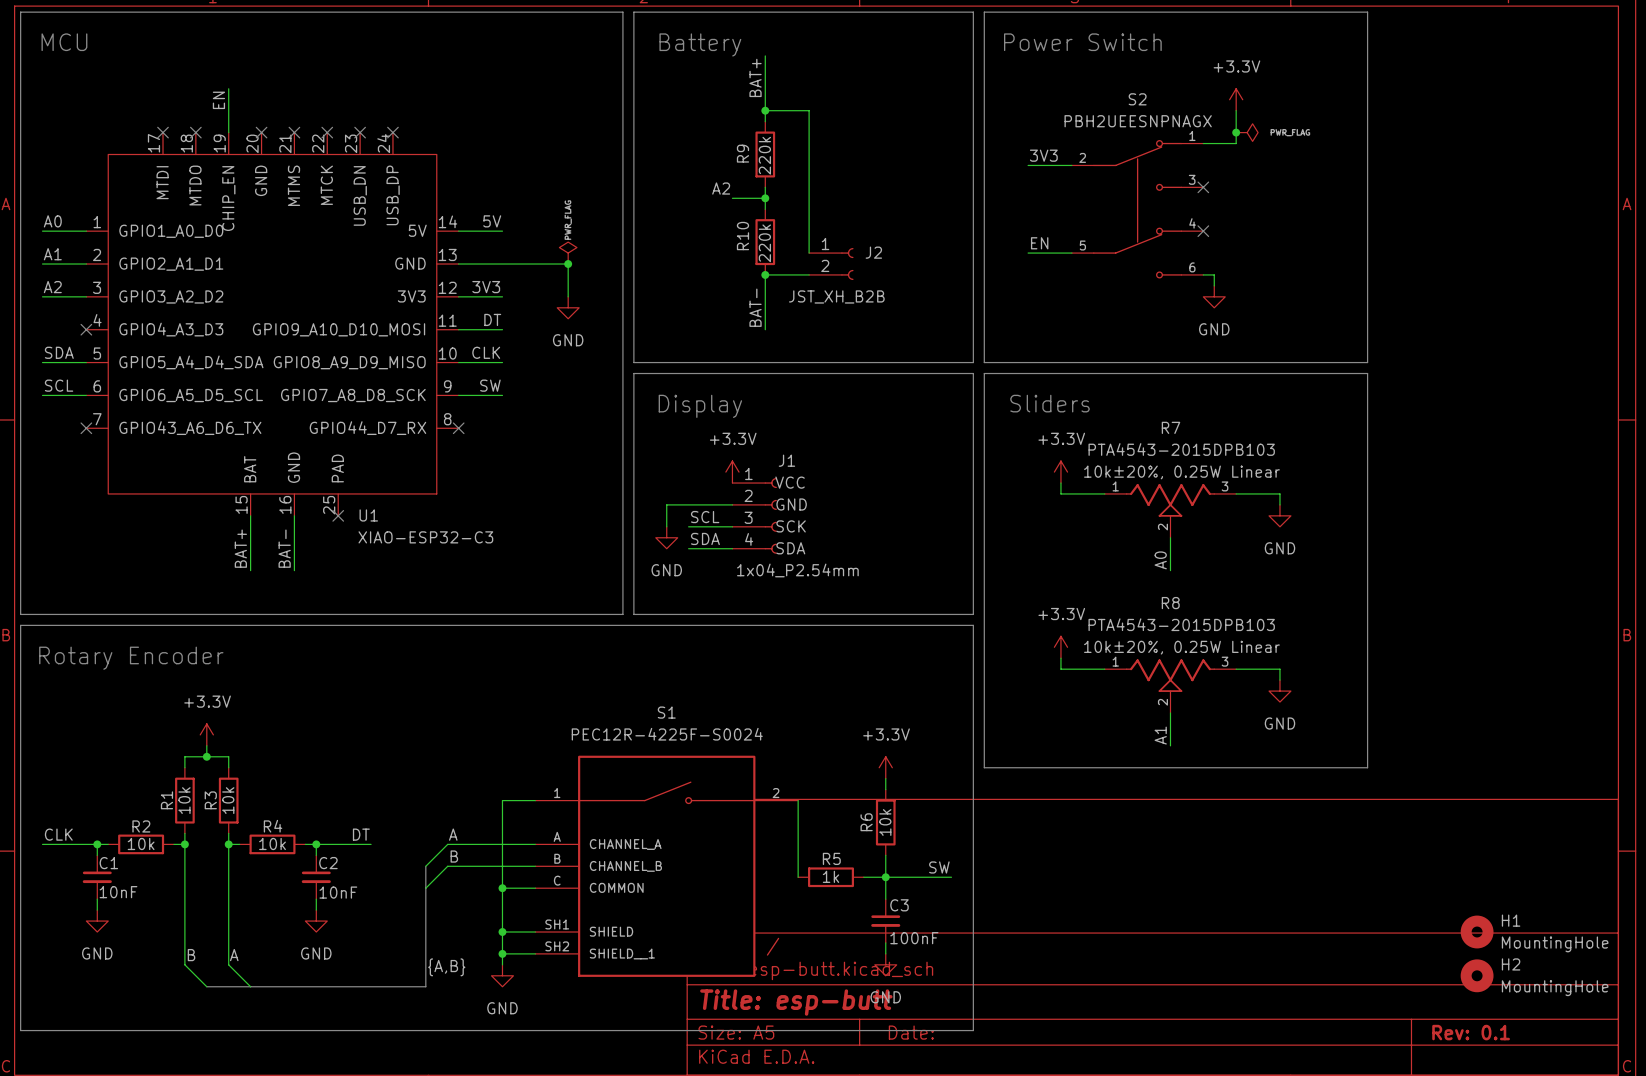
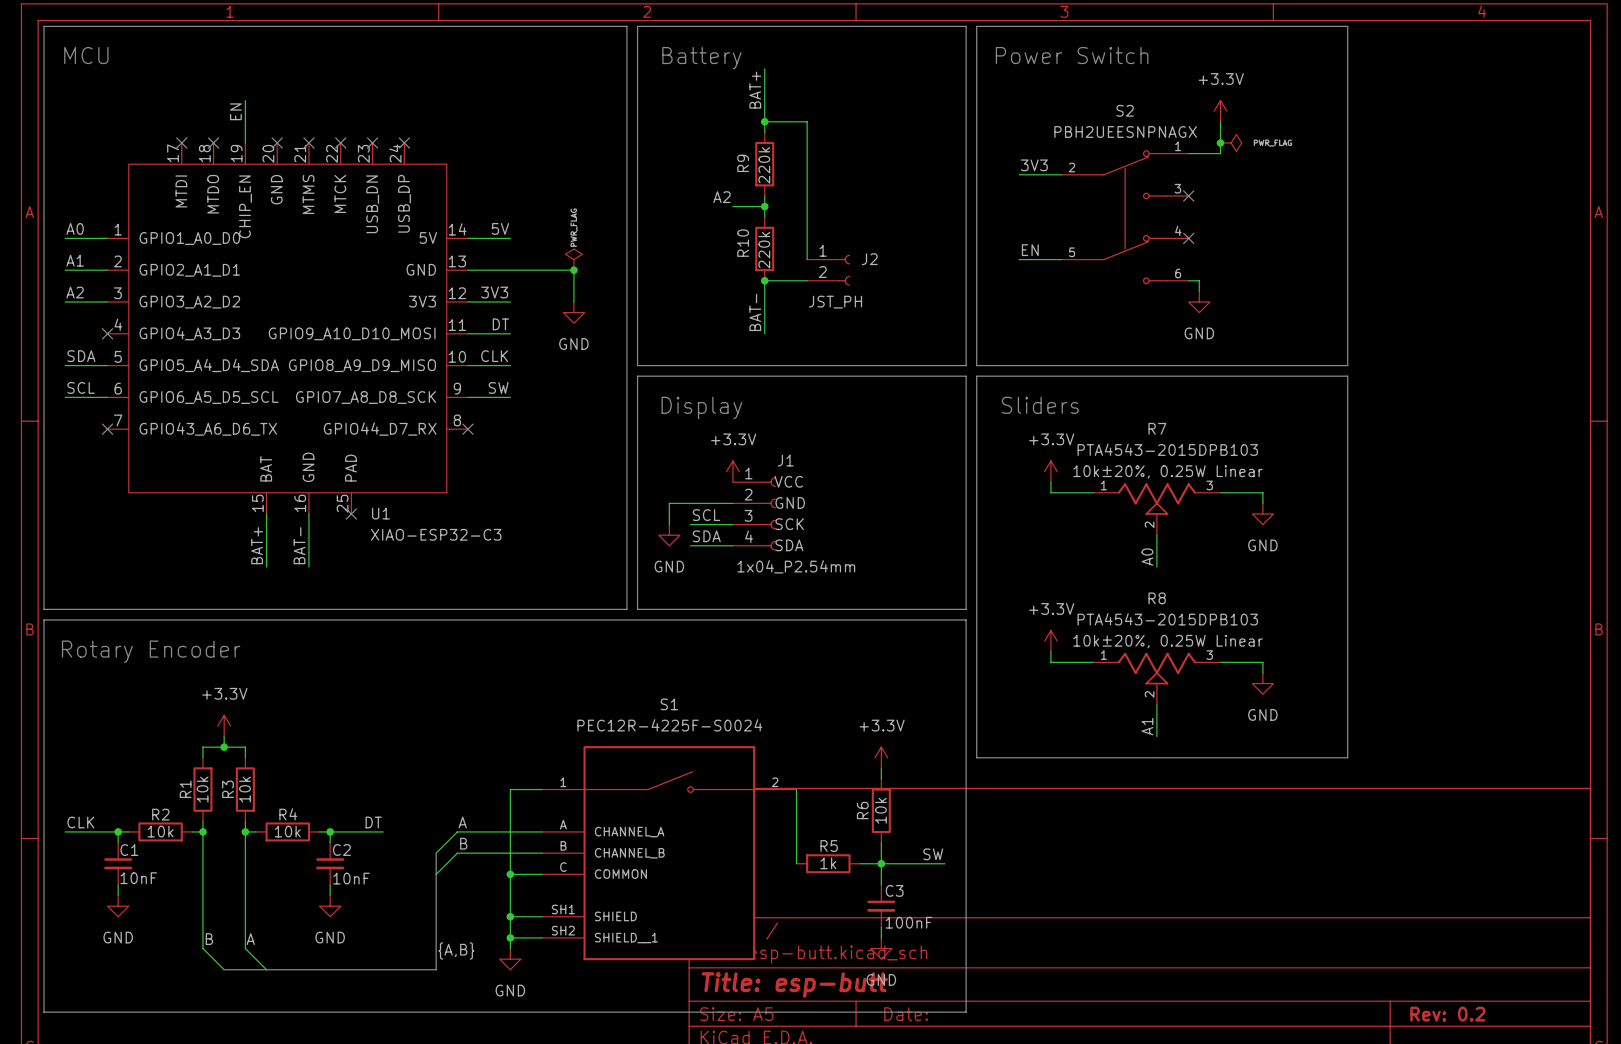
J2 value: JST_XH_B2B (836, 296) -> JST_PH (835, 302)
H1: MountingHole (1477, 932) -> none
H2: MountingHole (1477, 975) -> none
title block: Rev: 0.1 (1471, 1032) -> Rev: 0.2 (1447, 1014)

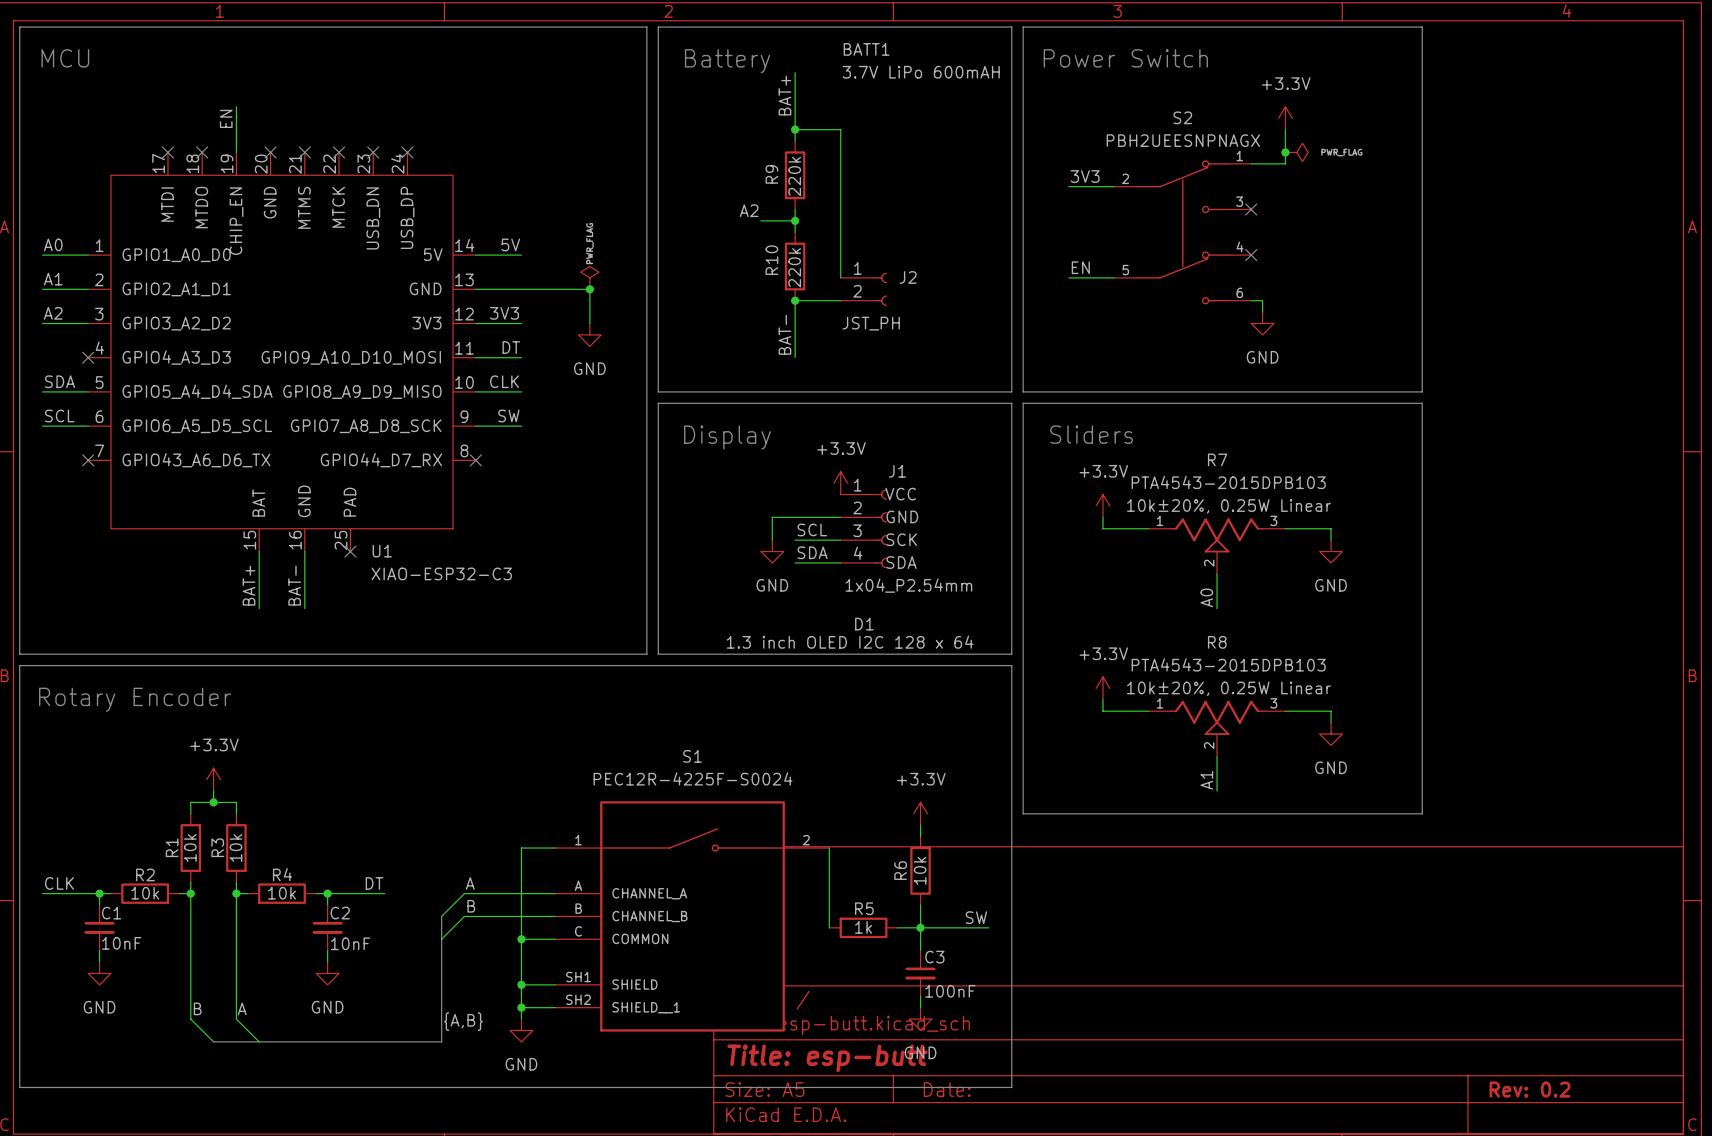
BATT1: none -> 3.7V LiPo 600mAH (921, 60)
power symbol position: +3.3V (732, 471) -> +3.3V (840, 483)
wire: (732, 503) (669, 503) (669, 524) -> (840, 517) (772, 517) (772, 540)
J1 position: (754, 513) -> (863, 528)
label position: SCL (706, 515) -> SCL (812, 529)
wire: (690, 524) (732, 524) -> (795, 562) (840, 562)
power symbol position: GND (669, 535) -> GND (772, 551)
label position: SDA (706, 536) -> SDA (812, 552)
wire: (690, 545) (732, 545) -> (795, 540) (840, 540)
D1: none -> 1.3 inch OLED I2C 128 x 64 (850, 633)

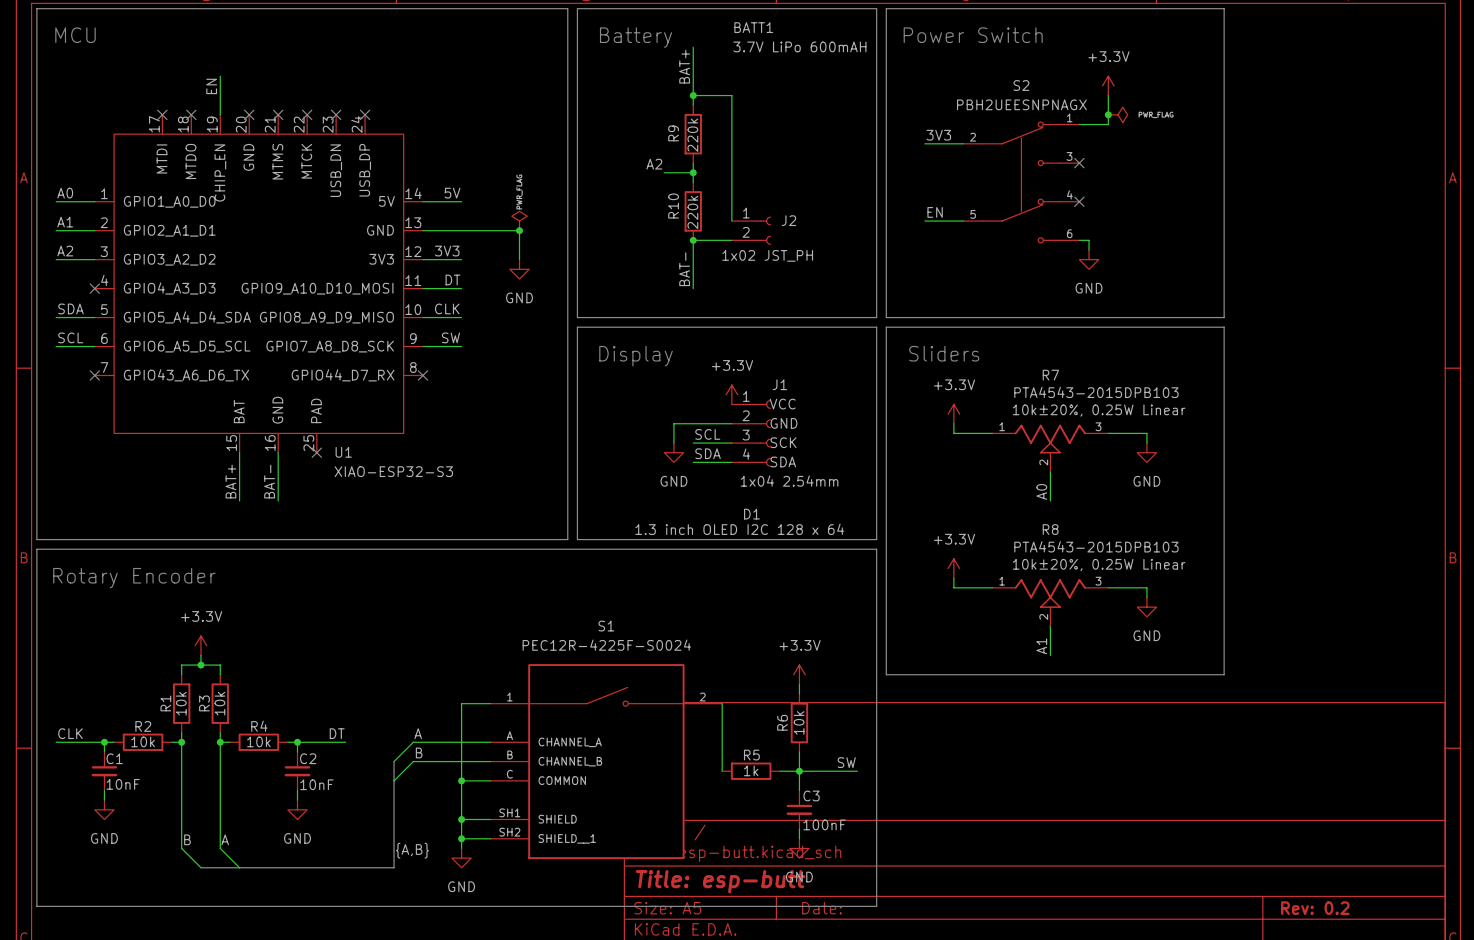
J2 value: JST_PH (871, 323) -> 1x02 JST_PH (767, 255)
R7 value position: PTA4543-2015DPB103 (1228, 482) -> PTA4543-2015DPB103 (1096, 392)
R7 text: none -> 10k±20%, 0.25W Linear (1099, 410)
R7 text: 10k±20%, 0.25W Linear (1228, 506) -> none
U1 value: XIAO-ESP32-C3 (441, 573) -> XIAO-ESP32-S3 (393, 471)
J1 value: 1x04_P2.54mm (908, 585) -> 1x04 2.54mm (789, 481)
R8 value position: PTA4543-2015DPB103 (1228, 664) -> PTA4543-2015DPB103 (1096, 546)
R8 text: none -> 10k±20%, 0.25W Linear (1099, 565)
R8 text: 10k±20%, 0.25W Linear (1228, 688) -> none

